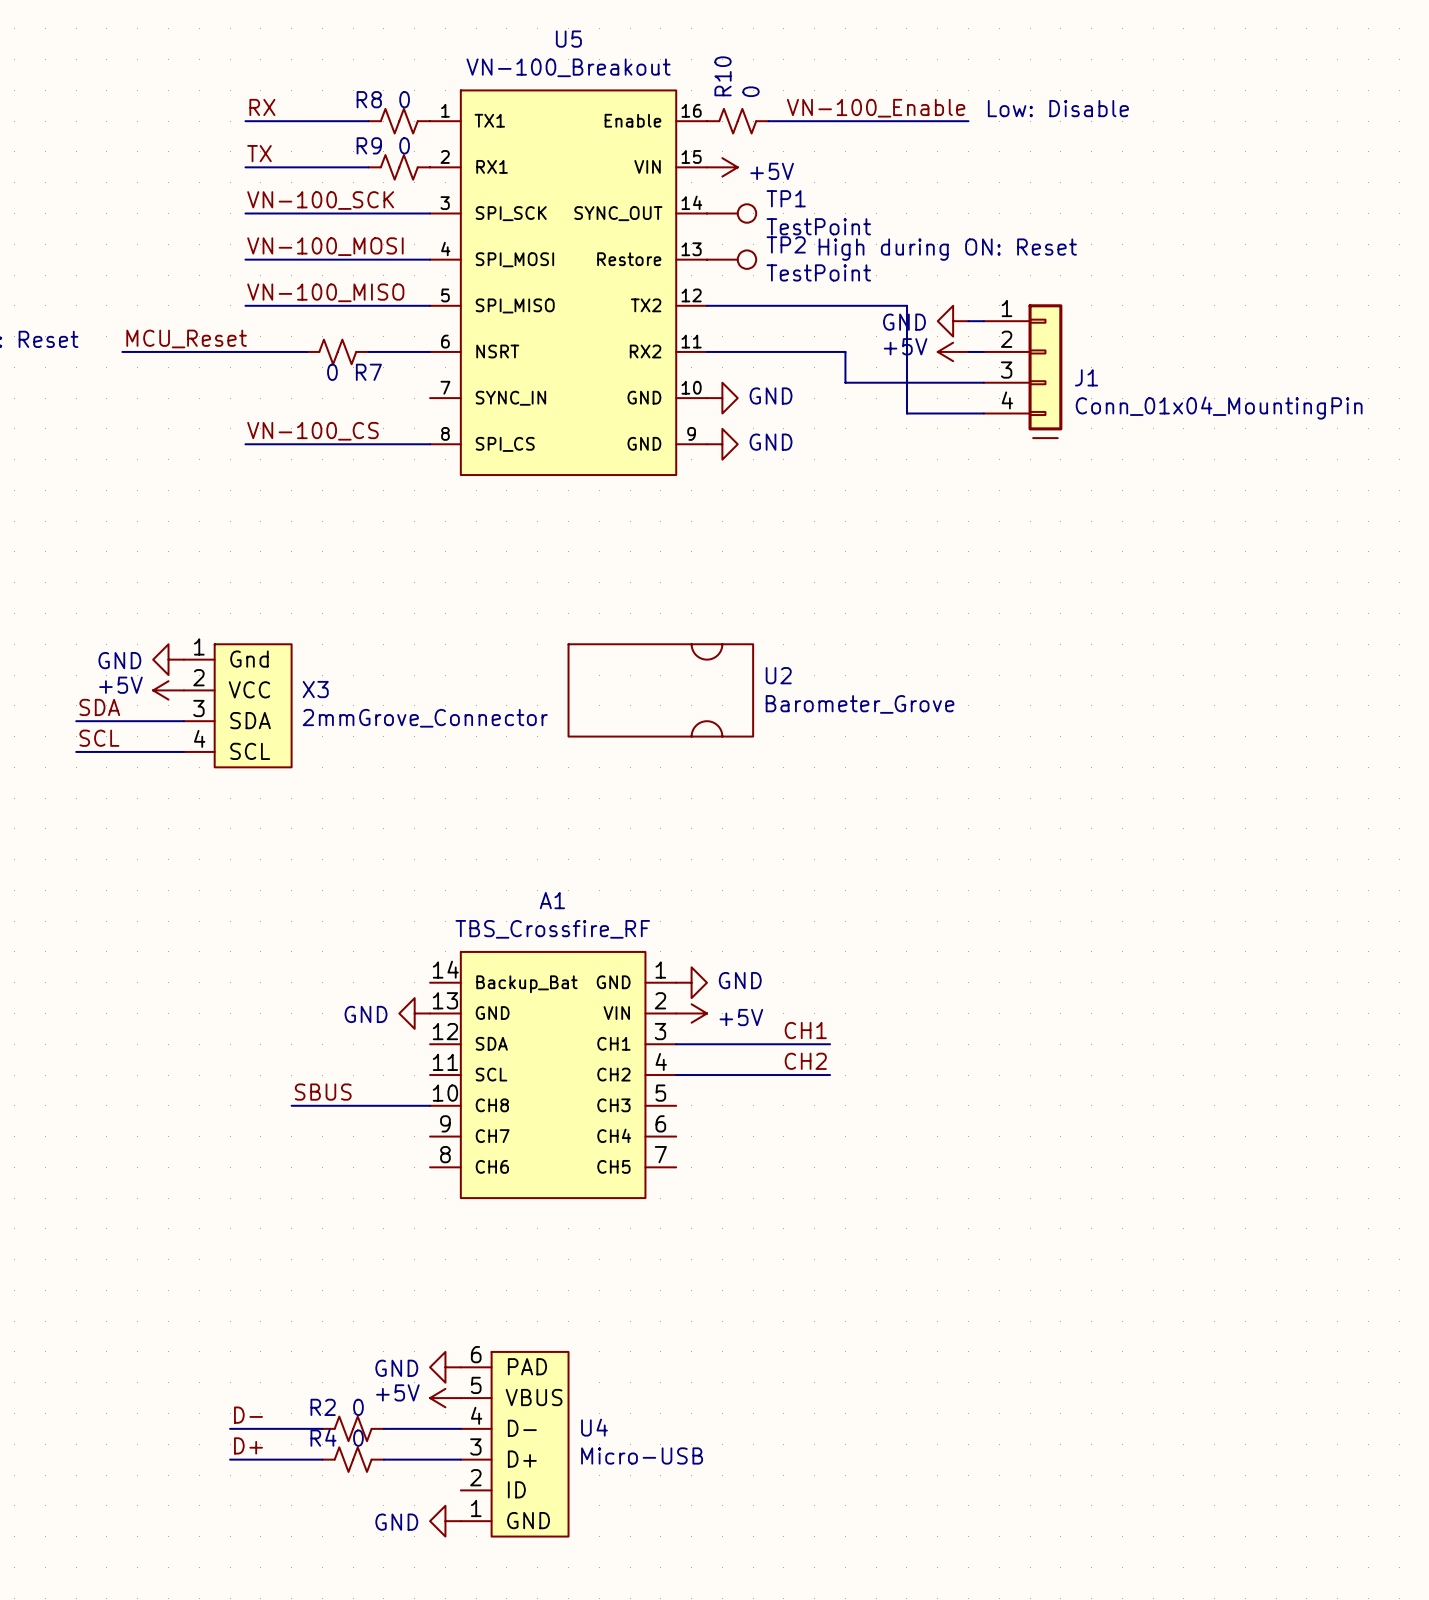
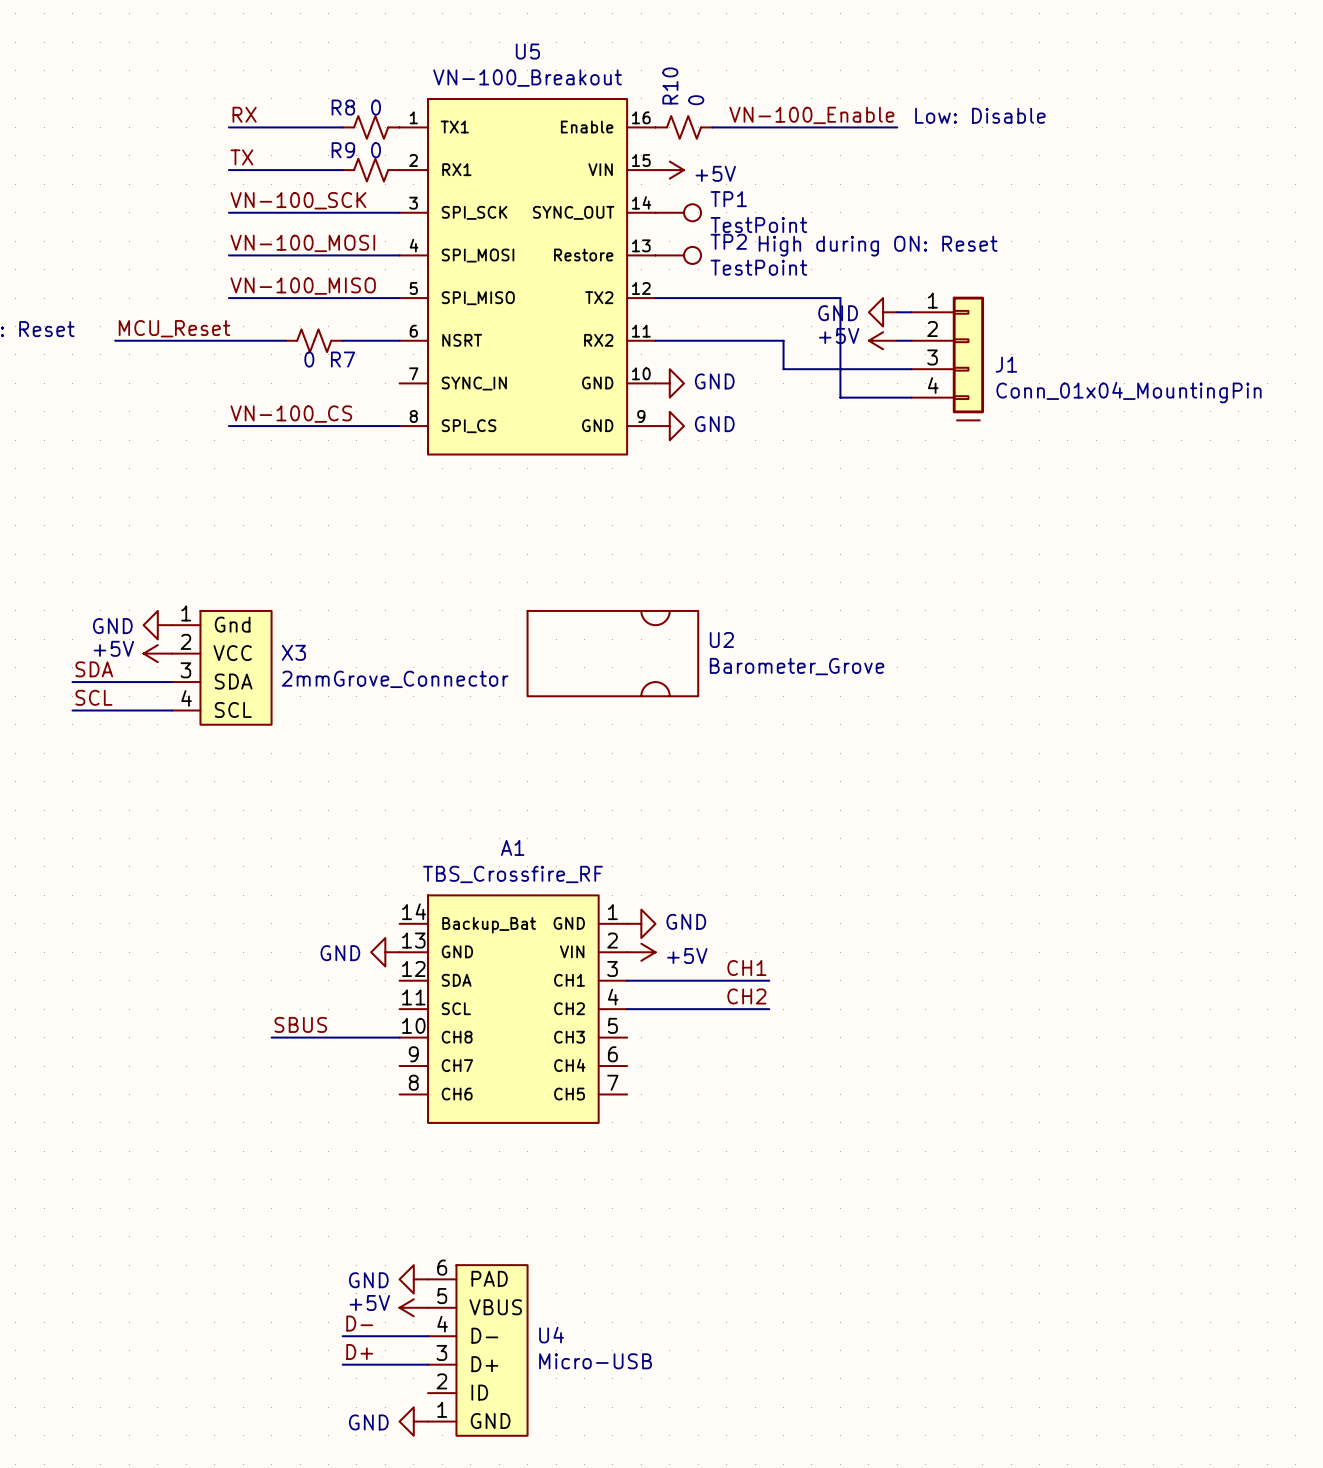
label position: D- (248, 1415) -> D- (359, 1323)
wire: (230, 1428) (322, 1428) -> none
R2: 0 (353, 1428) -> none
label position: D+ (248, 1445) -> D+ (359, 1351)
wire: (230, 1459) (322, 1459) -> none
R4: 0 (353, 1459) -> none

